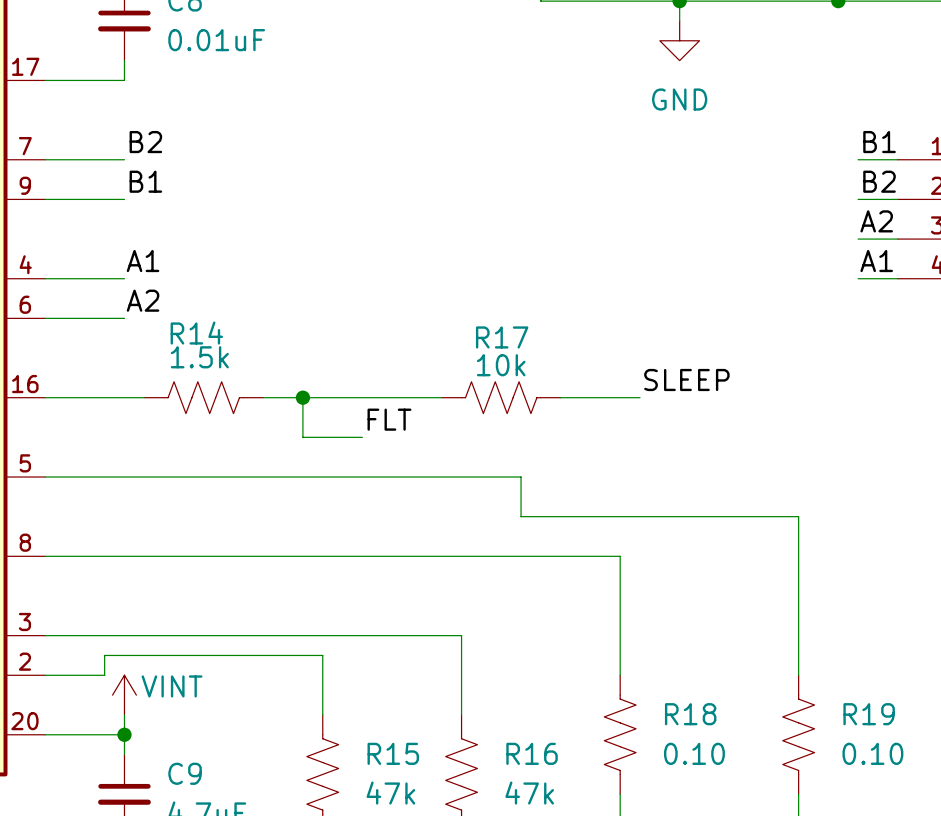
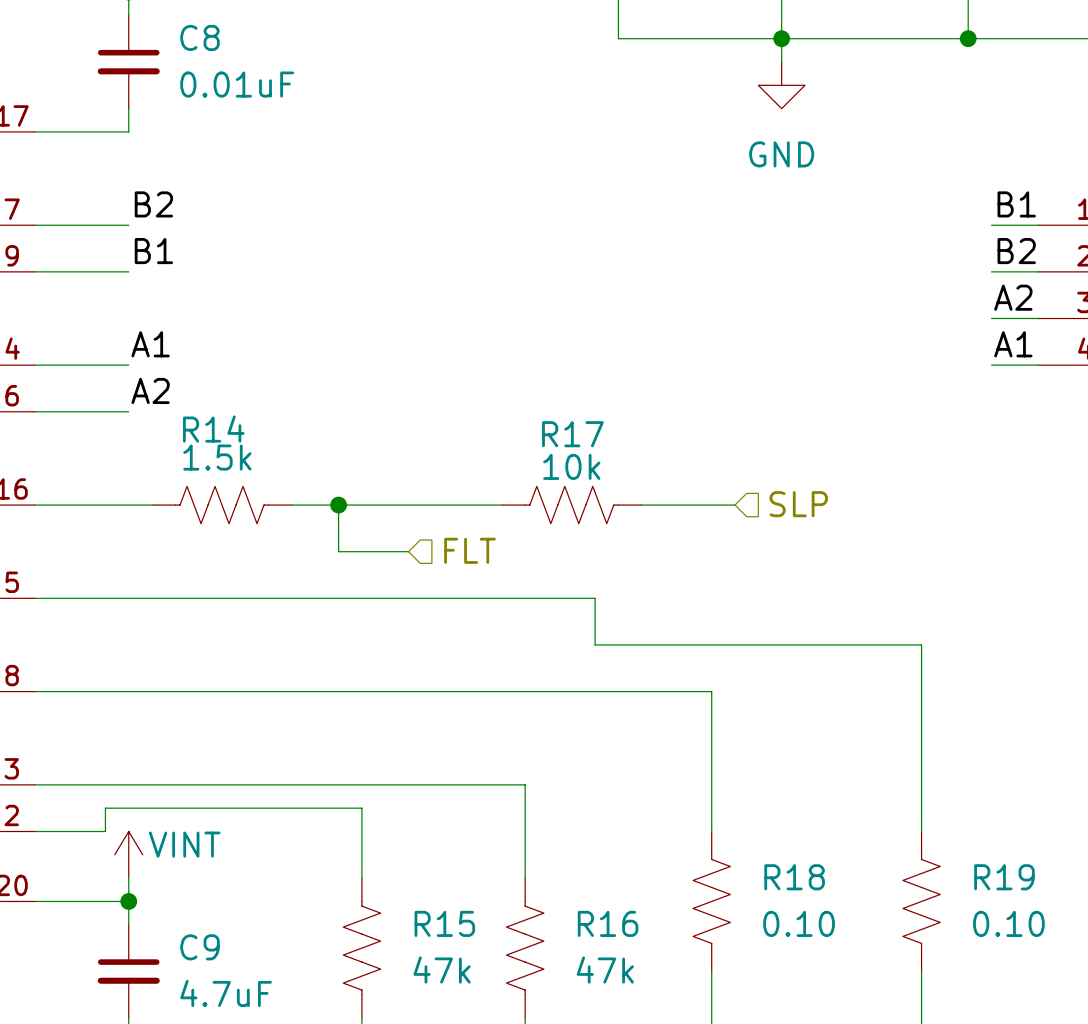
label: SLEEP (686, 380) -> none
hierarchical label: none -> SLP (798, 504)
label: FLT (389, 419) -> none
hierarchical label: none -> FLT (470, 550)

